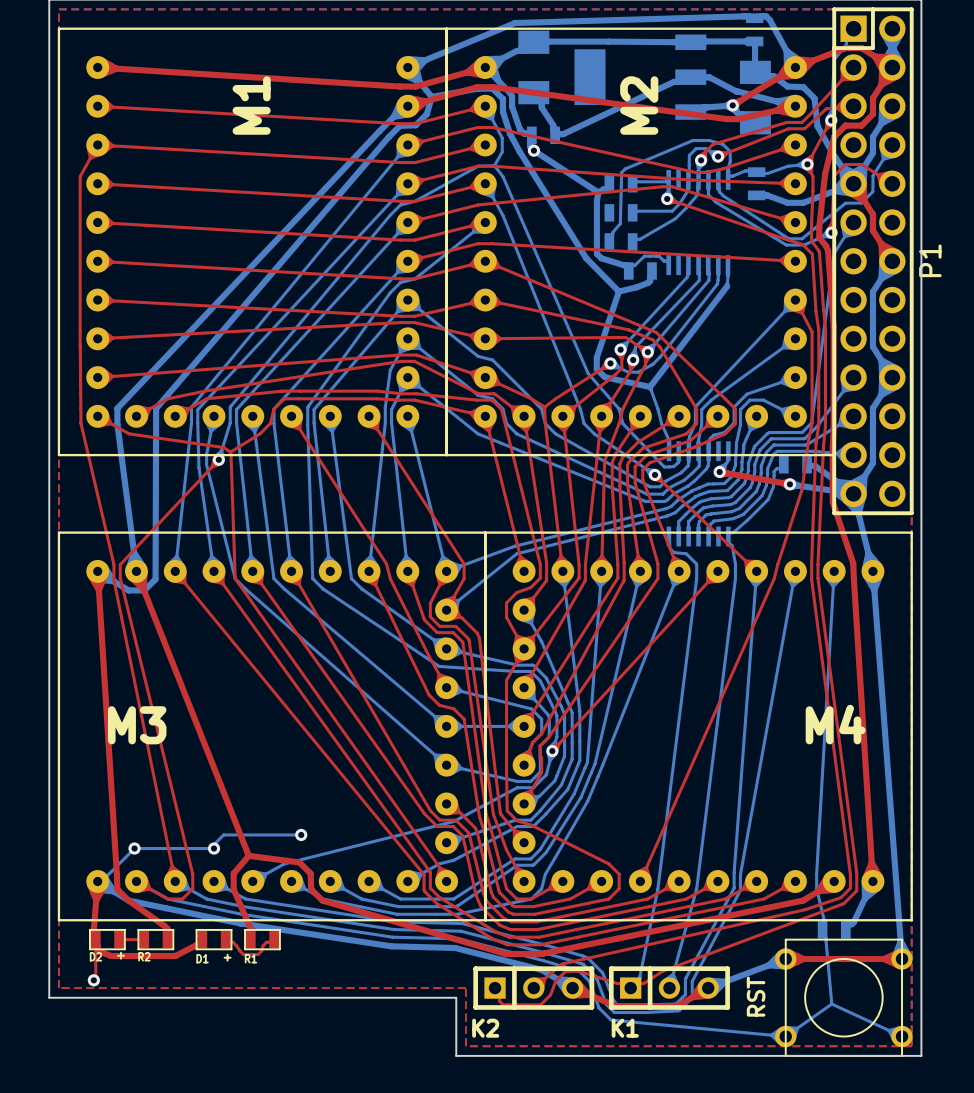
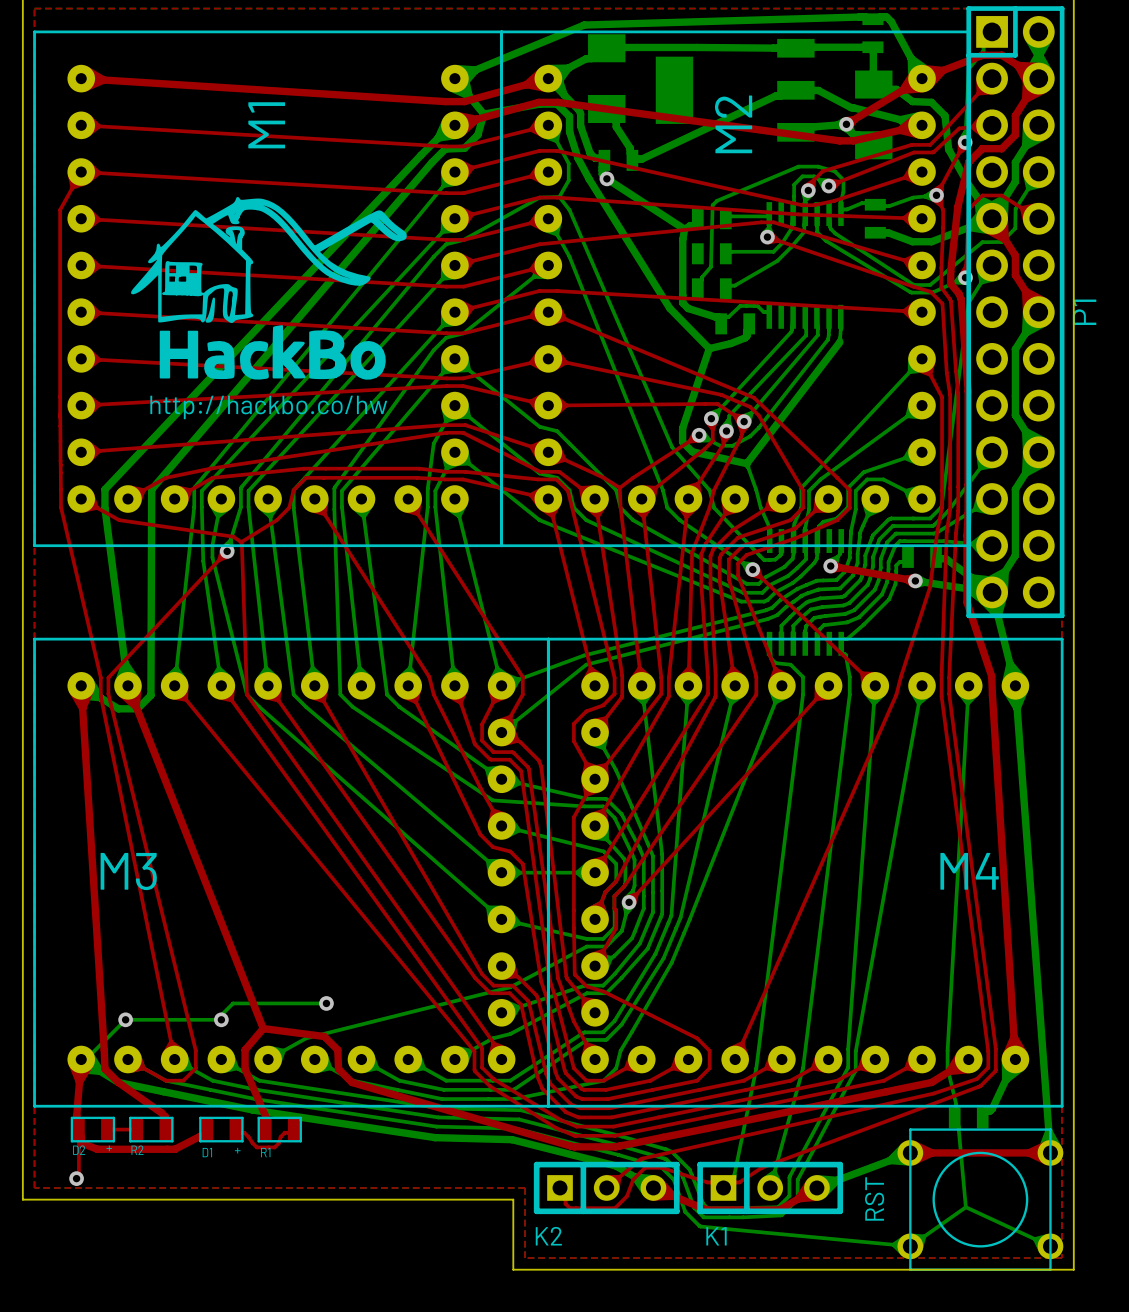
drawing: none -> [131, 196, 407, 380]
text: none -> http://hackbo.co/hw (268, 407)

